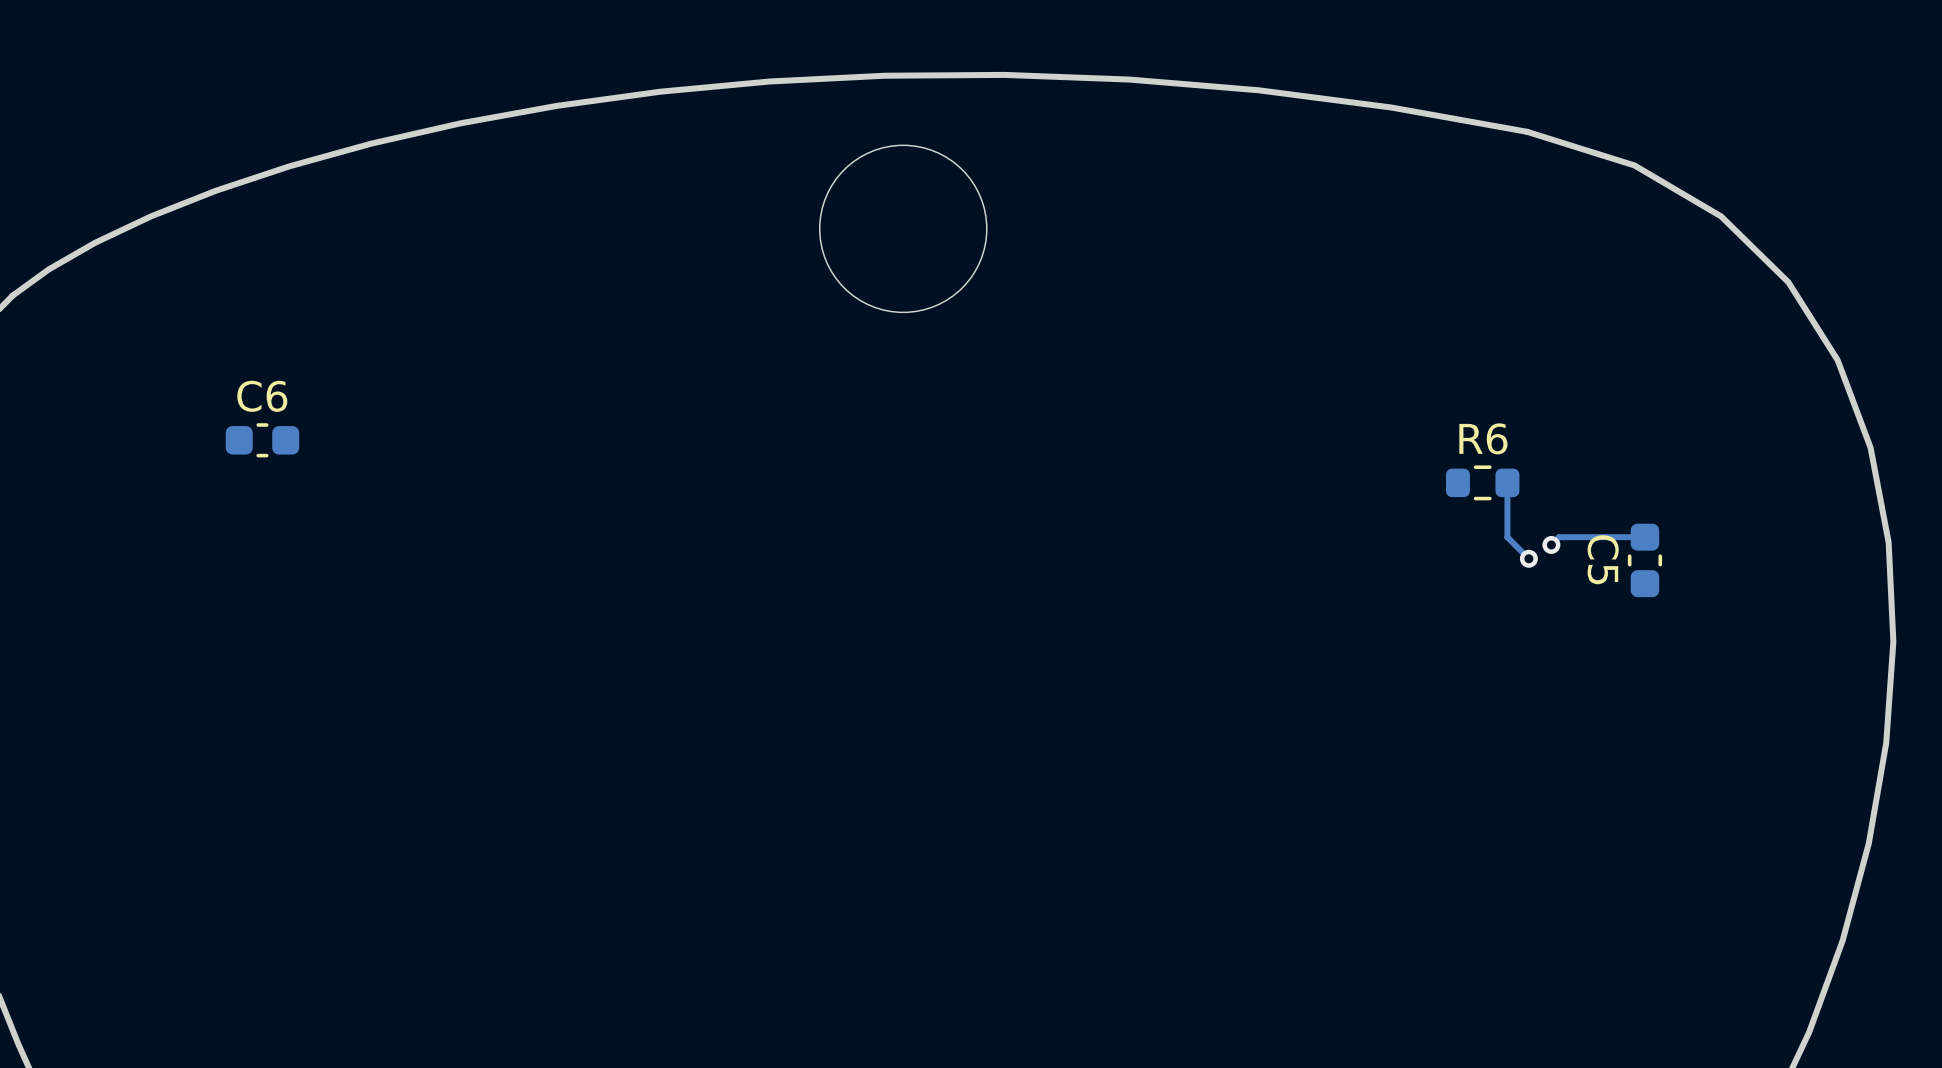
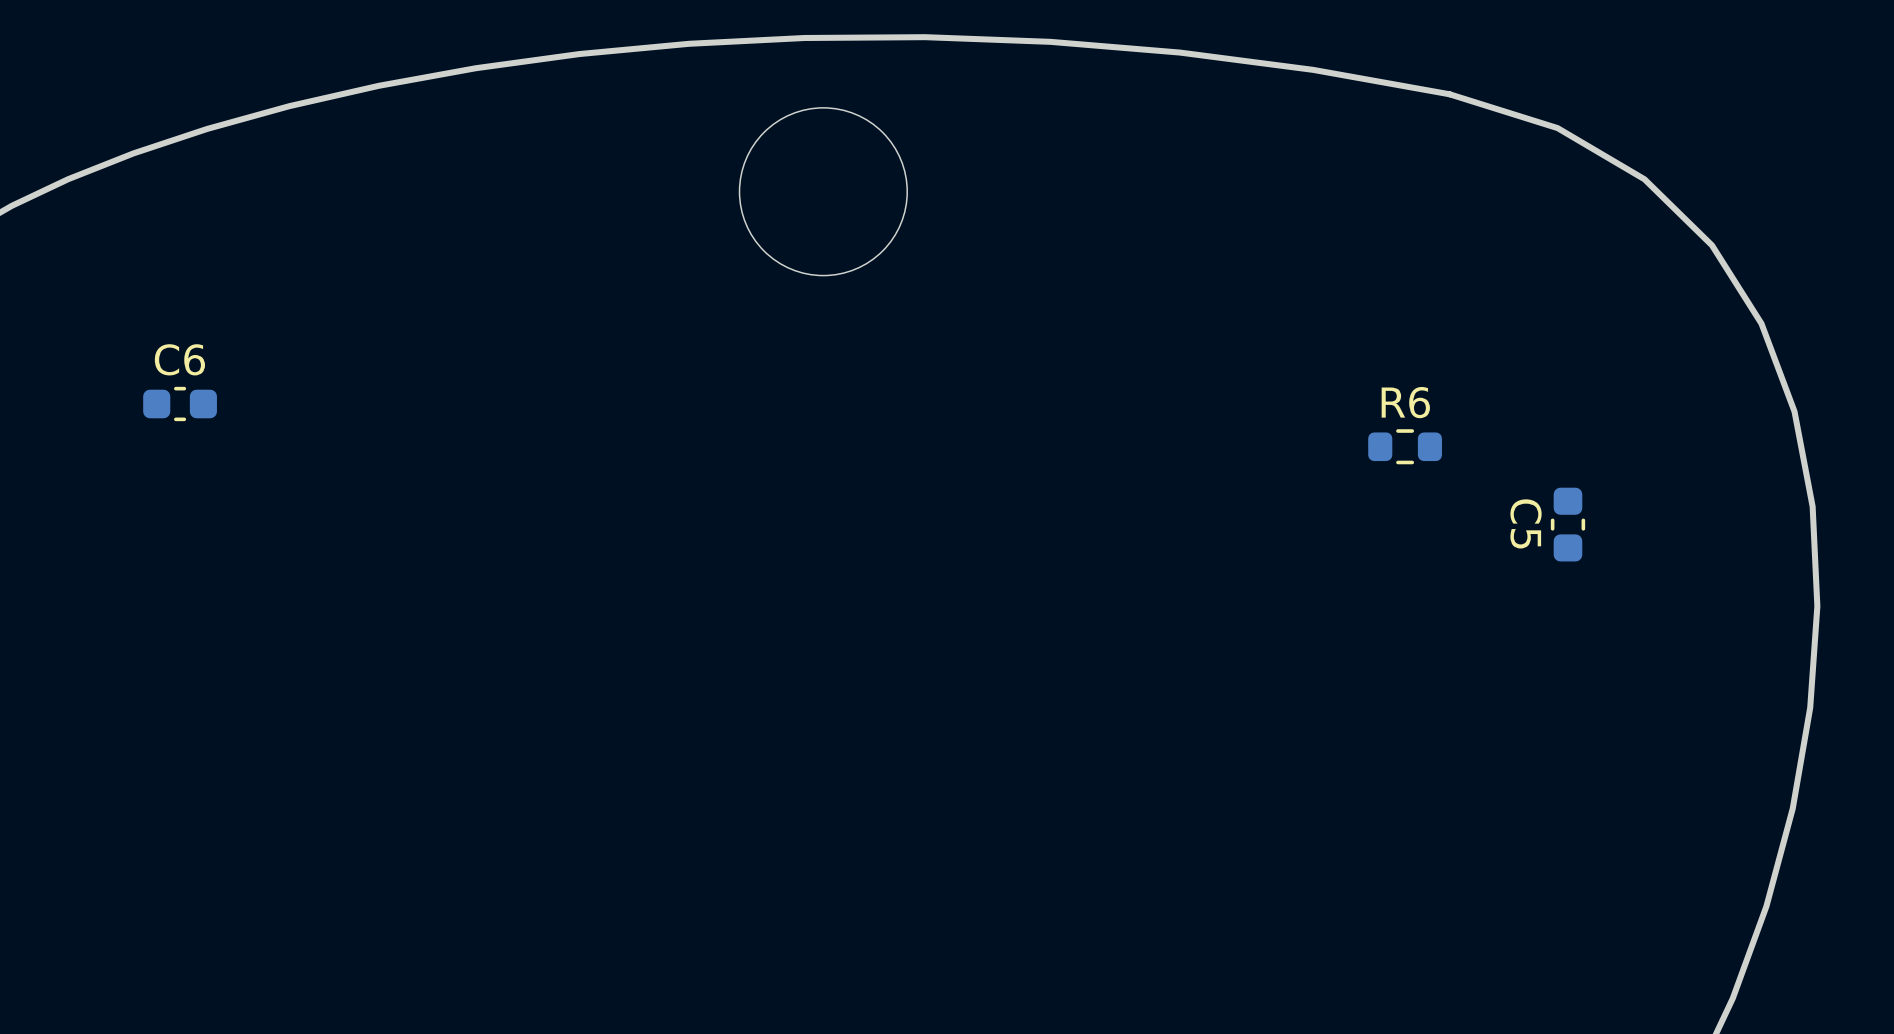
track: (1507, 482) (1507, 537) (1528, 558) -> none
track: (1644, 537) (1559, 537) (1551, 544) -> none
via: (1551, 544) -> none
via: (1528, 558) -> none

